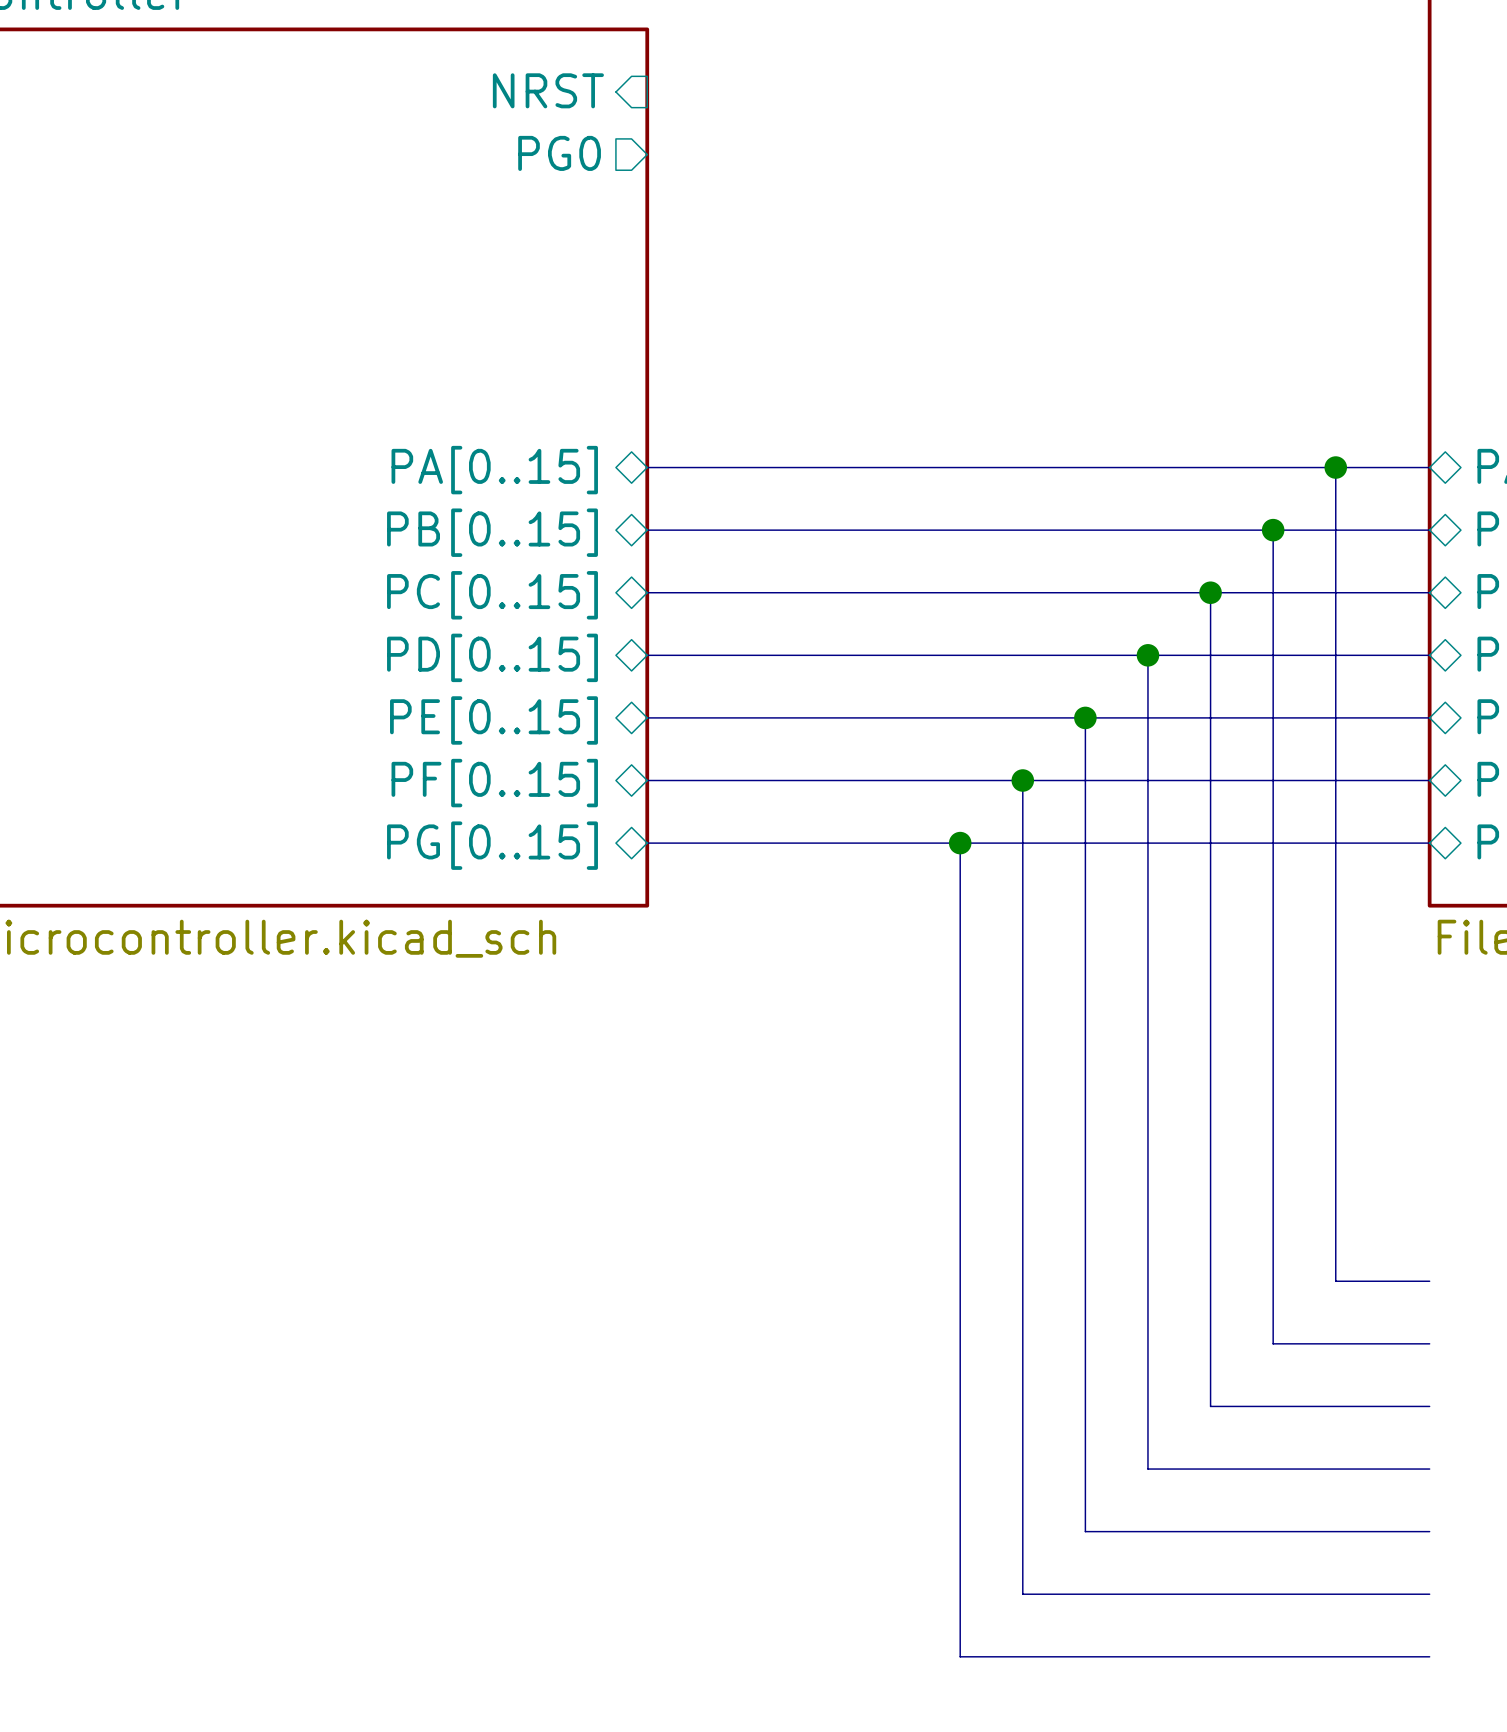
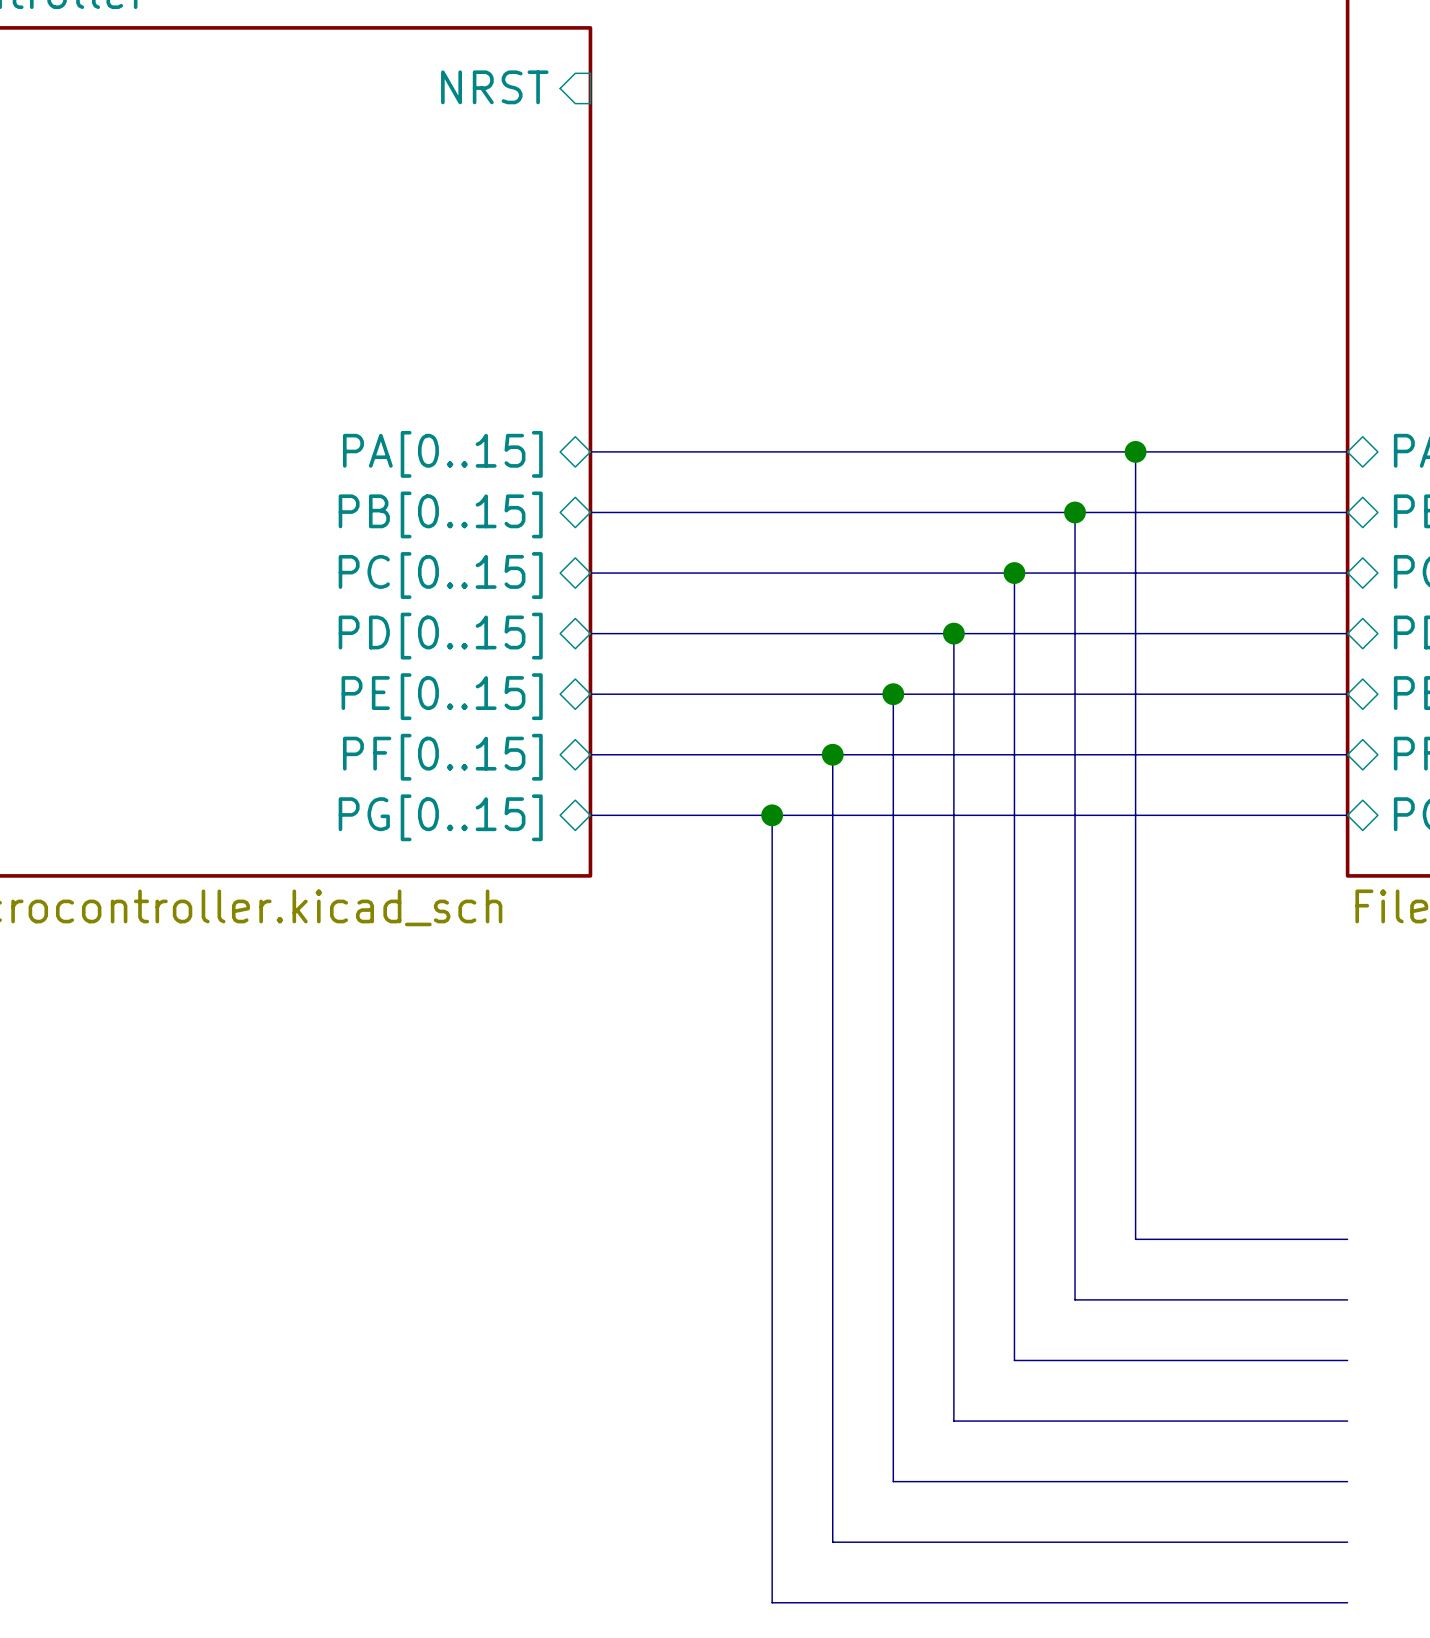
sheet pin: PG0 (559, 153) -> none
bus: none -> (1135, 451) (1135, 573)
junction: none -> (1135, 451)
bus: (1335, 467) (1335, 1281) -> none
junction: (1335, 467) -> none
bus: none -> (1075, 512) (1075, 633)
junction: none -> (1075, 512)
bus: (1273, 530) (1273, 1343) -> (1075, 1299) (1196, 1299)
junction: (1273, 530) -> none
bus: none -> (1014, 573) (1014, 694)
junction: none -> (1014, 573)
junction: (1210, 592) -> none
bus: none -> (953, 633) (953, 754)
junction: none -> (953, 633)
junction: (1147, 655) -> none
bus: none -> (893, 694) (893, 815)
junction: none -> (893, 694)
junction: (1085, 717) -> none
junction: none -> (832, 754)
junction: (1022, 780) -> none
bus: none -> (772, 815) (772, 1602) (893, 1602)
junction: none -> (772, 815)
junction: (960, 843) -> none
bus: (1210, 1281) (1210, 1406) -> (1135, 1239) (1256, 1239)
bus: (1147, 1343) (1147, 1469) -> (953, 1421) (1075, 1421)
bus: (1085, 1406) (1085, 1531) -> (1014, 1360) (1135, 1360)
bus: (1022, 1469) (1022, 1594) -> (832, 754) (832, 1542) (953, 1542)
bus: (960, 1531) (960, 1656) -> (893, 1481) (1014, 1481)

